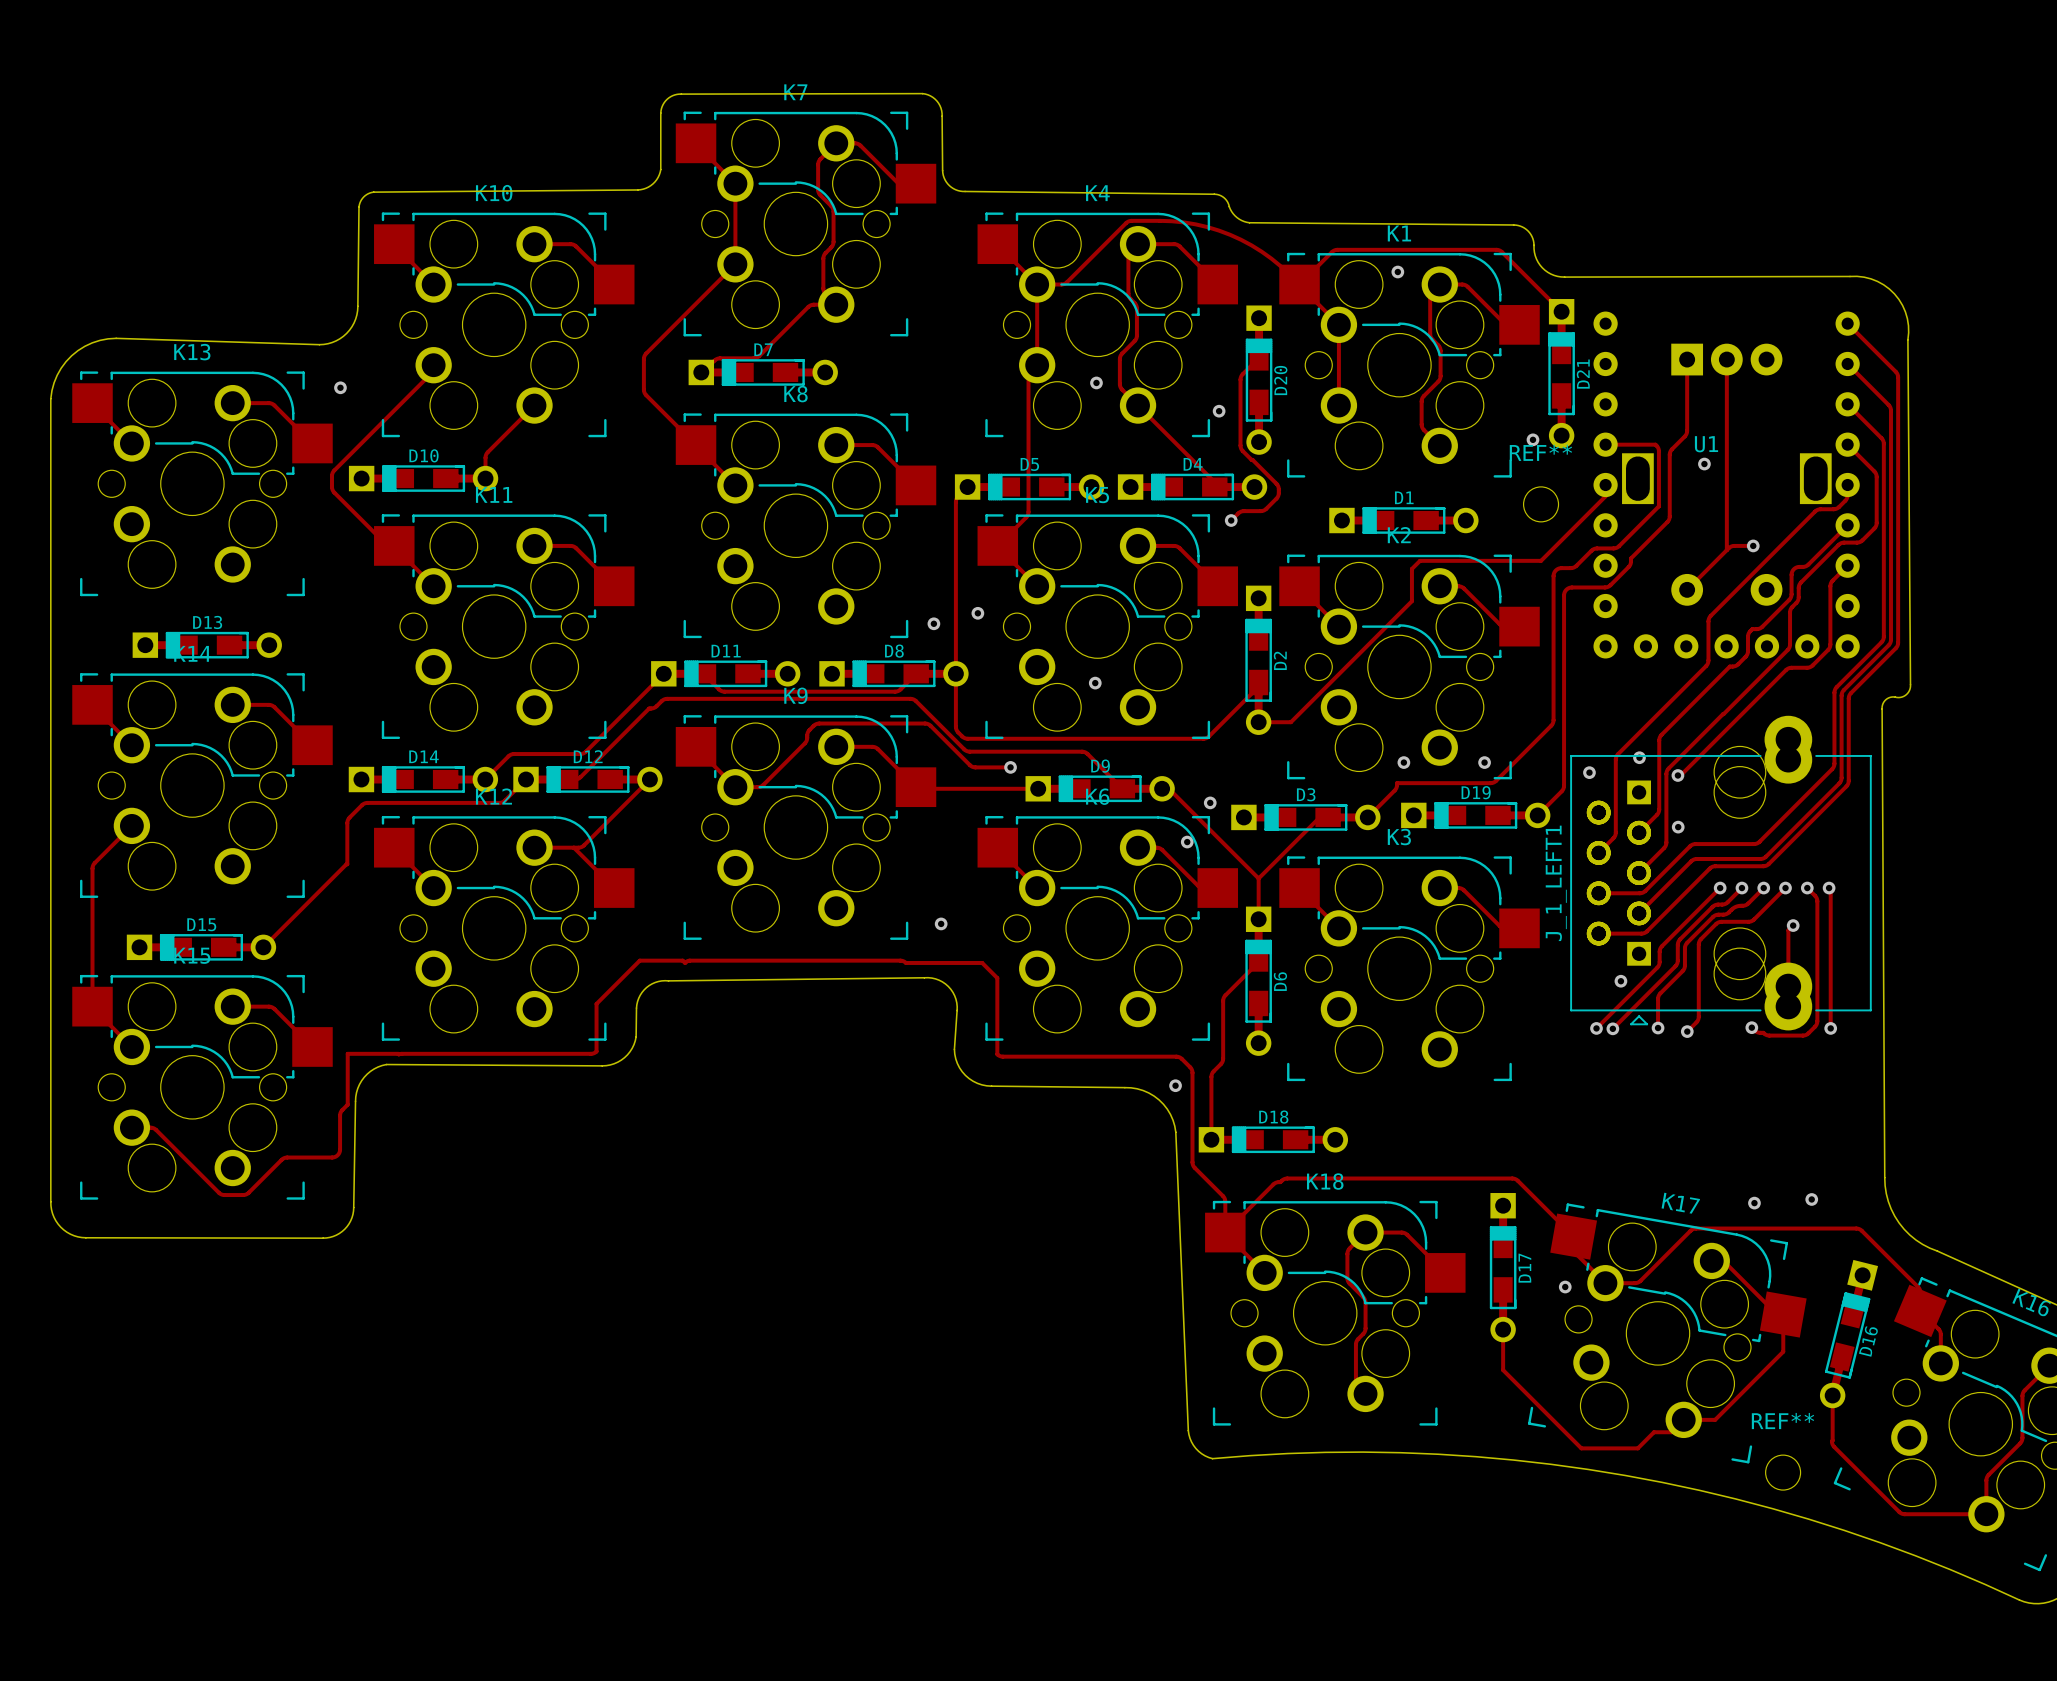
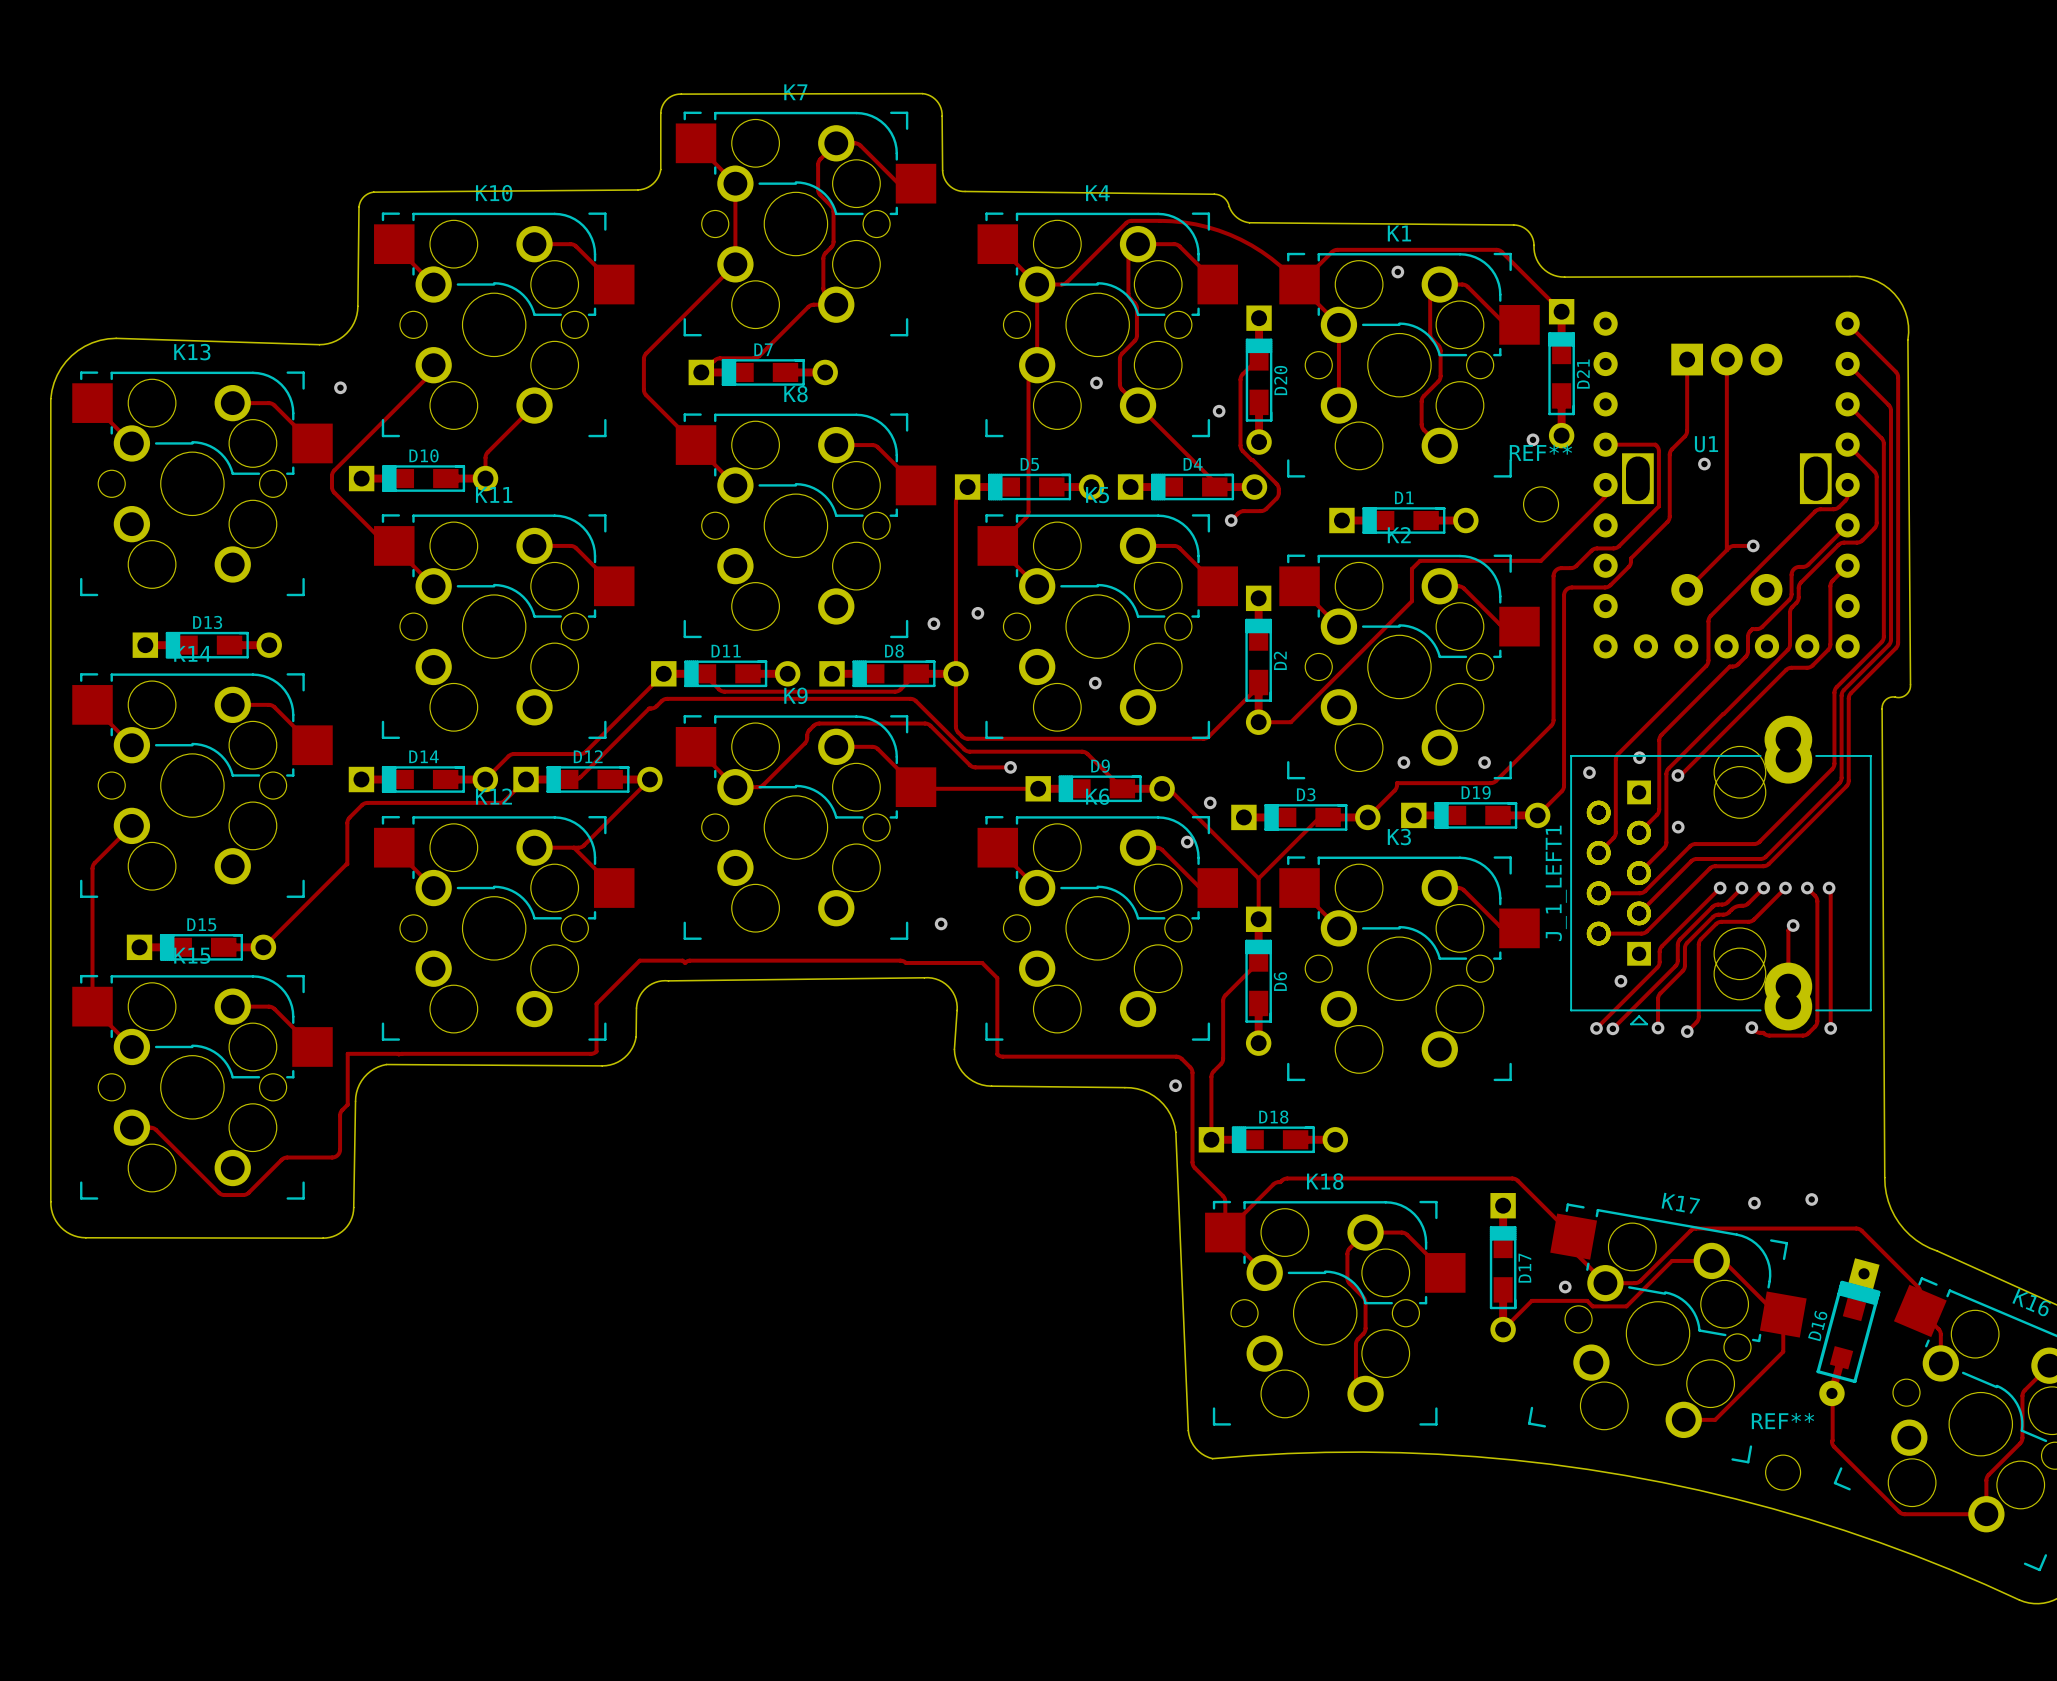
D16 footprint: [1819, 1259, 1879, 1409] -> [1816, 1258, 1881, 1407]
track: (1503, 1329) (1503, 1370) (1581, 1448) (1637, 1448) (1654, 1432) (1671, 1432) (1683, 1419) -> (1503, 1329) (1531, 1300) (1587, 1300) (1592, 1306) (1626, 1306) (1672, 1260) (1711, 1260)
D16 name rotation: 0° (1868, 1341) -> 1° clockwise (1817, 1326)
D16 name position: D16 (1868, 1341) -> D16 (1817, 1326)

